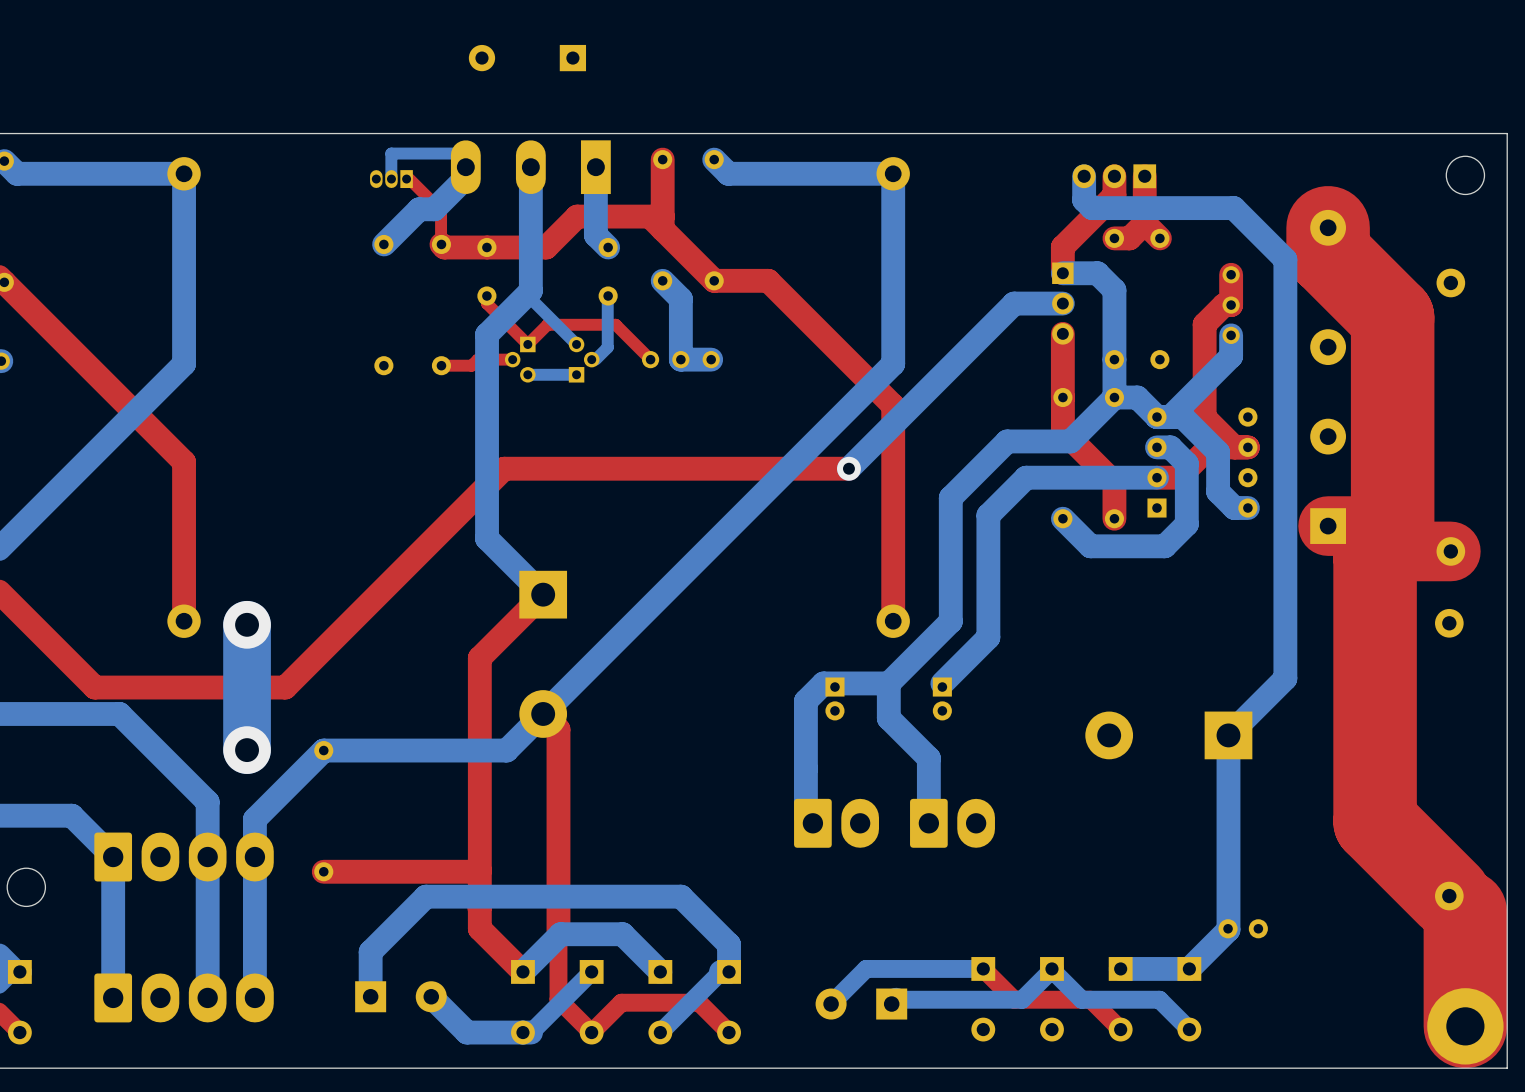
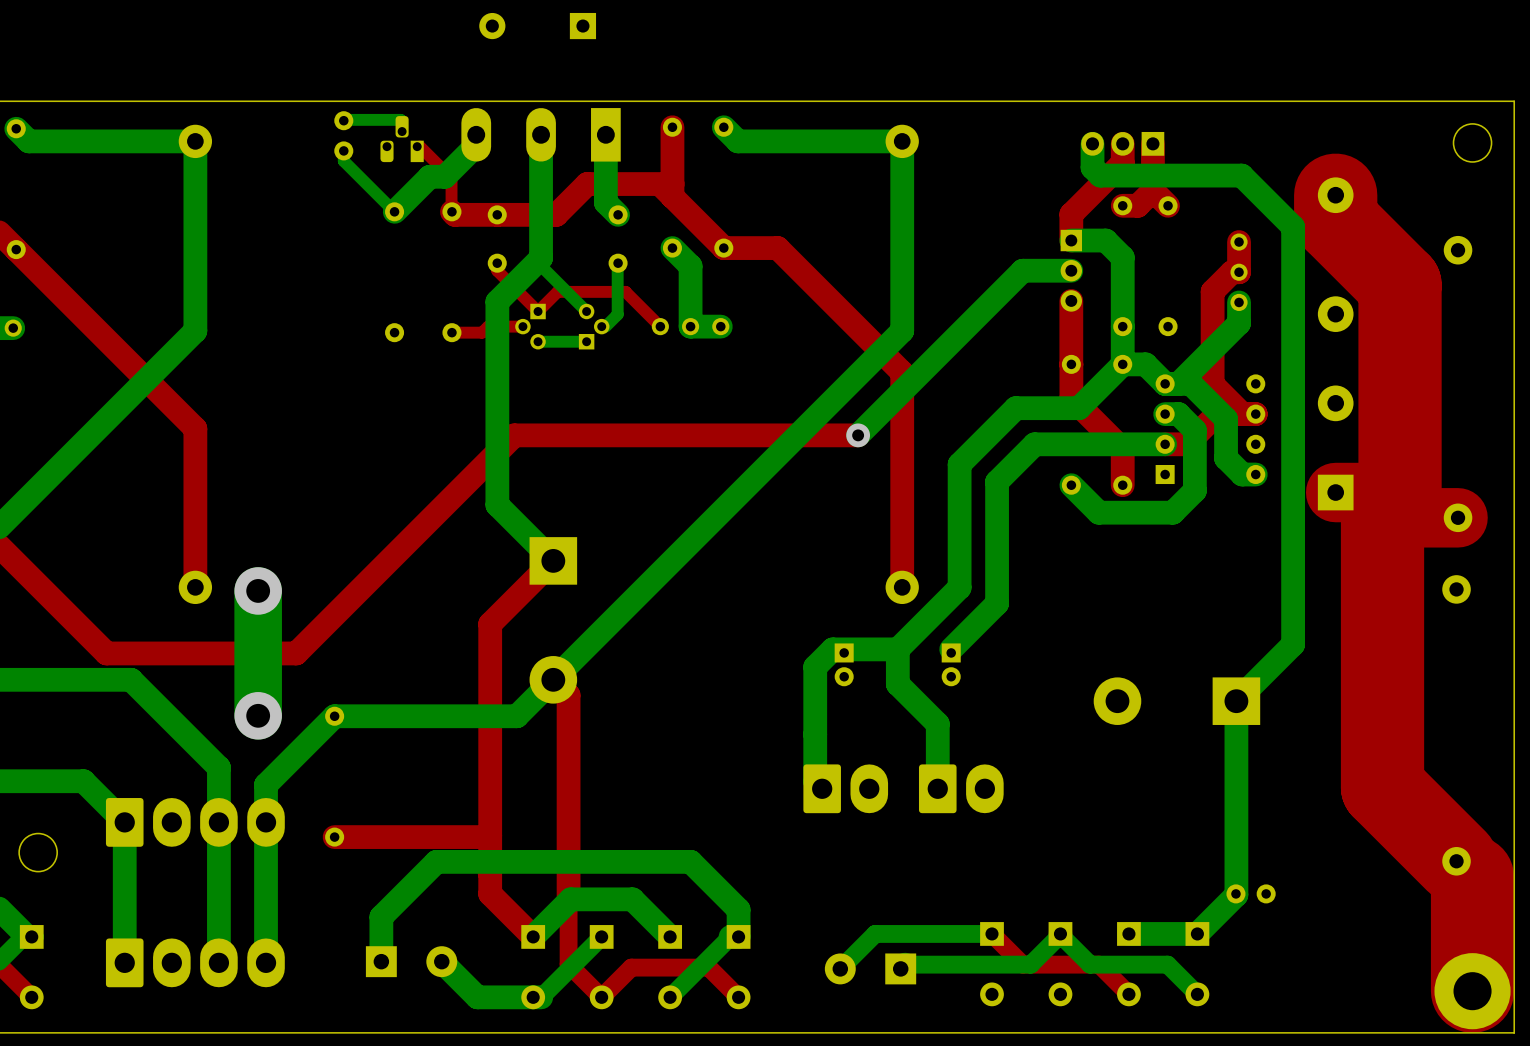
bottom track: none -> (343, 120) (401, 121)
bottom track: (465, 153) (391, 153) (391, 175) -> none
part: none -> (343, 135)
part footprint: [370, 170, 413, 189] -> [380, 116, 424, 163]
bottom track: none -> (343, 150) (343, 161) (394, 211)

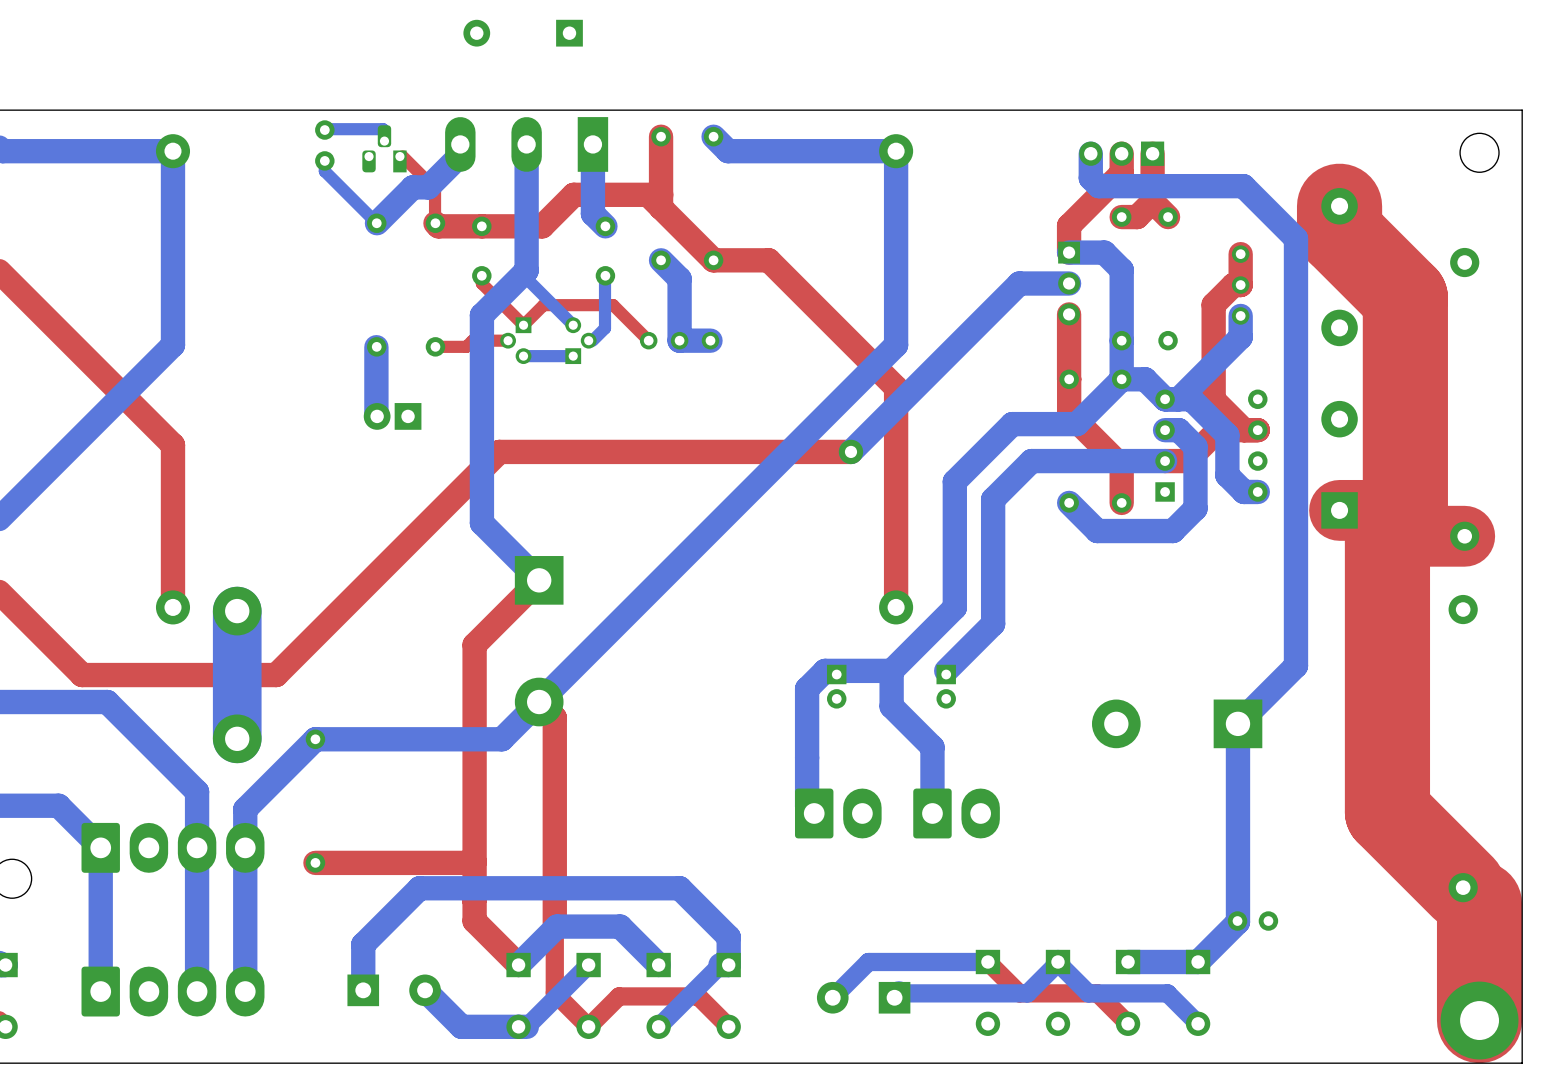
bottom track: none -> (376, 347) (376, 416)
part: none -> (392, 416)

